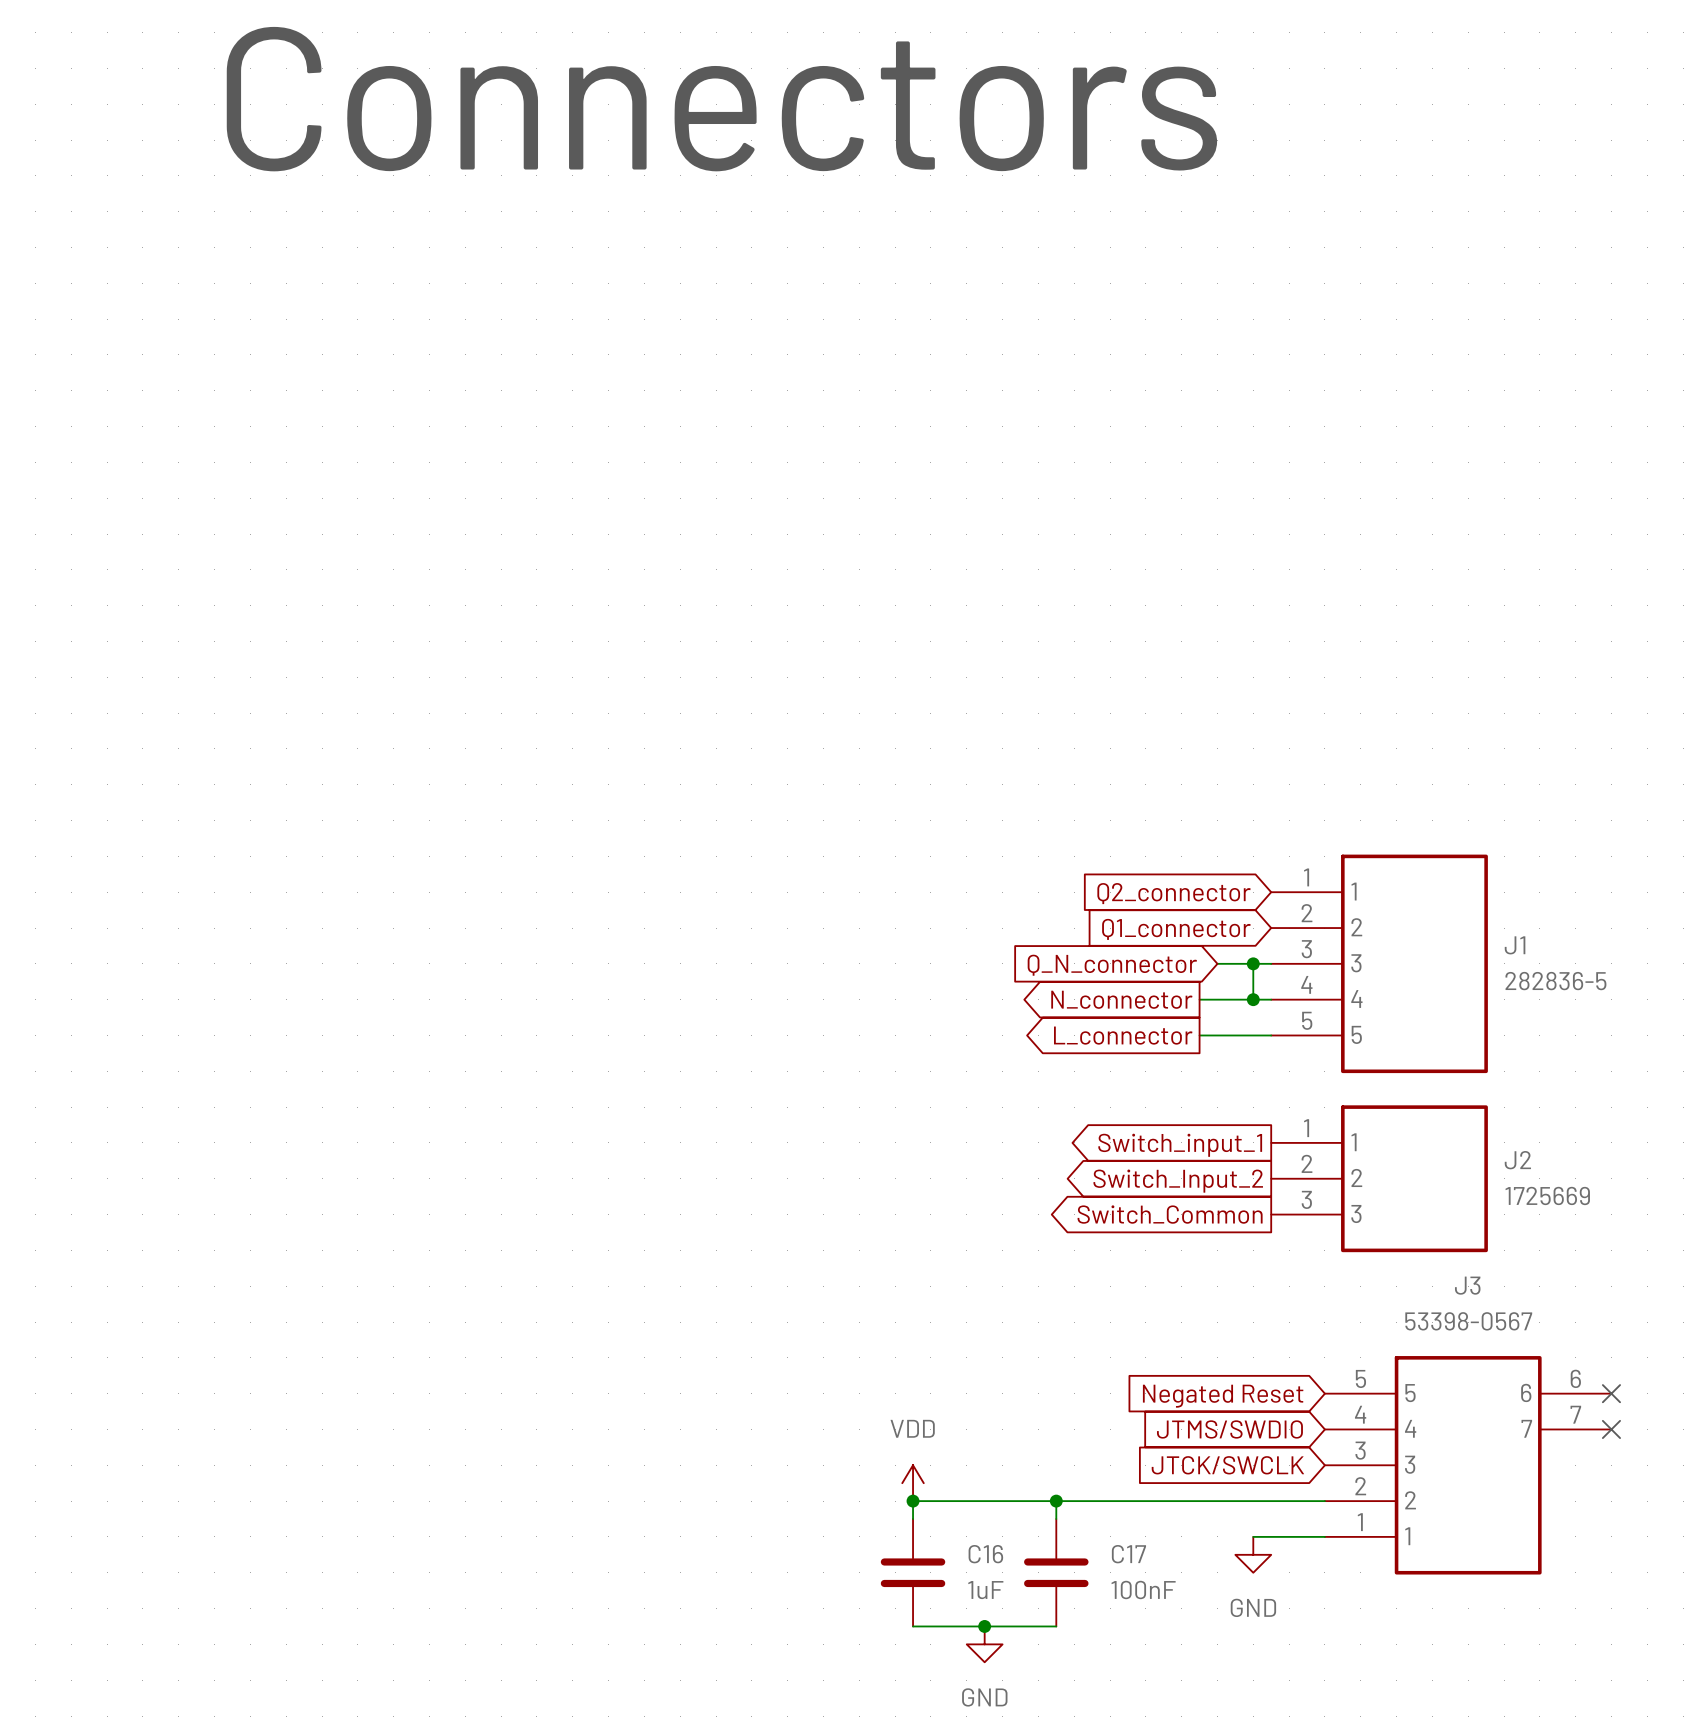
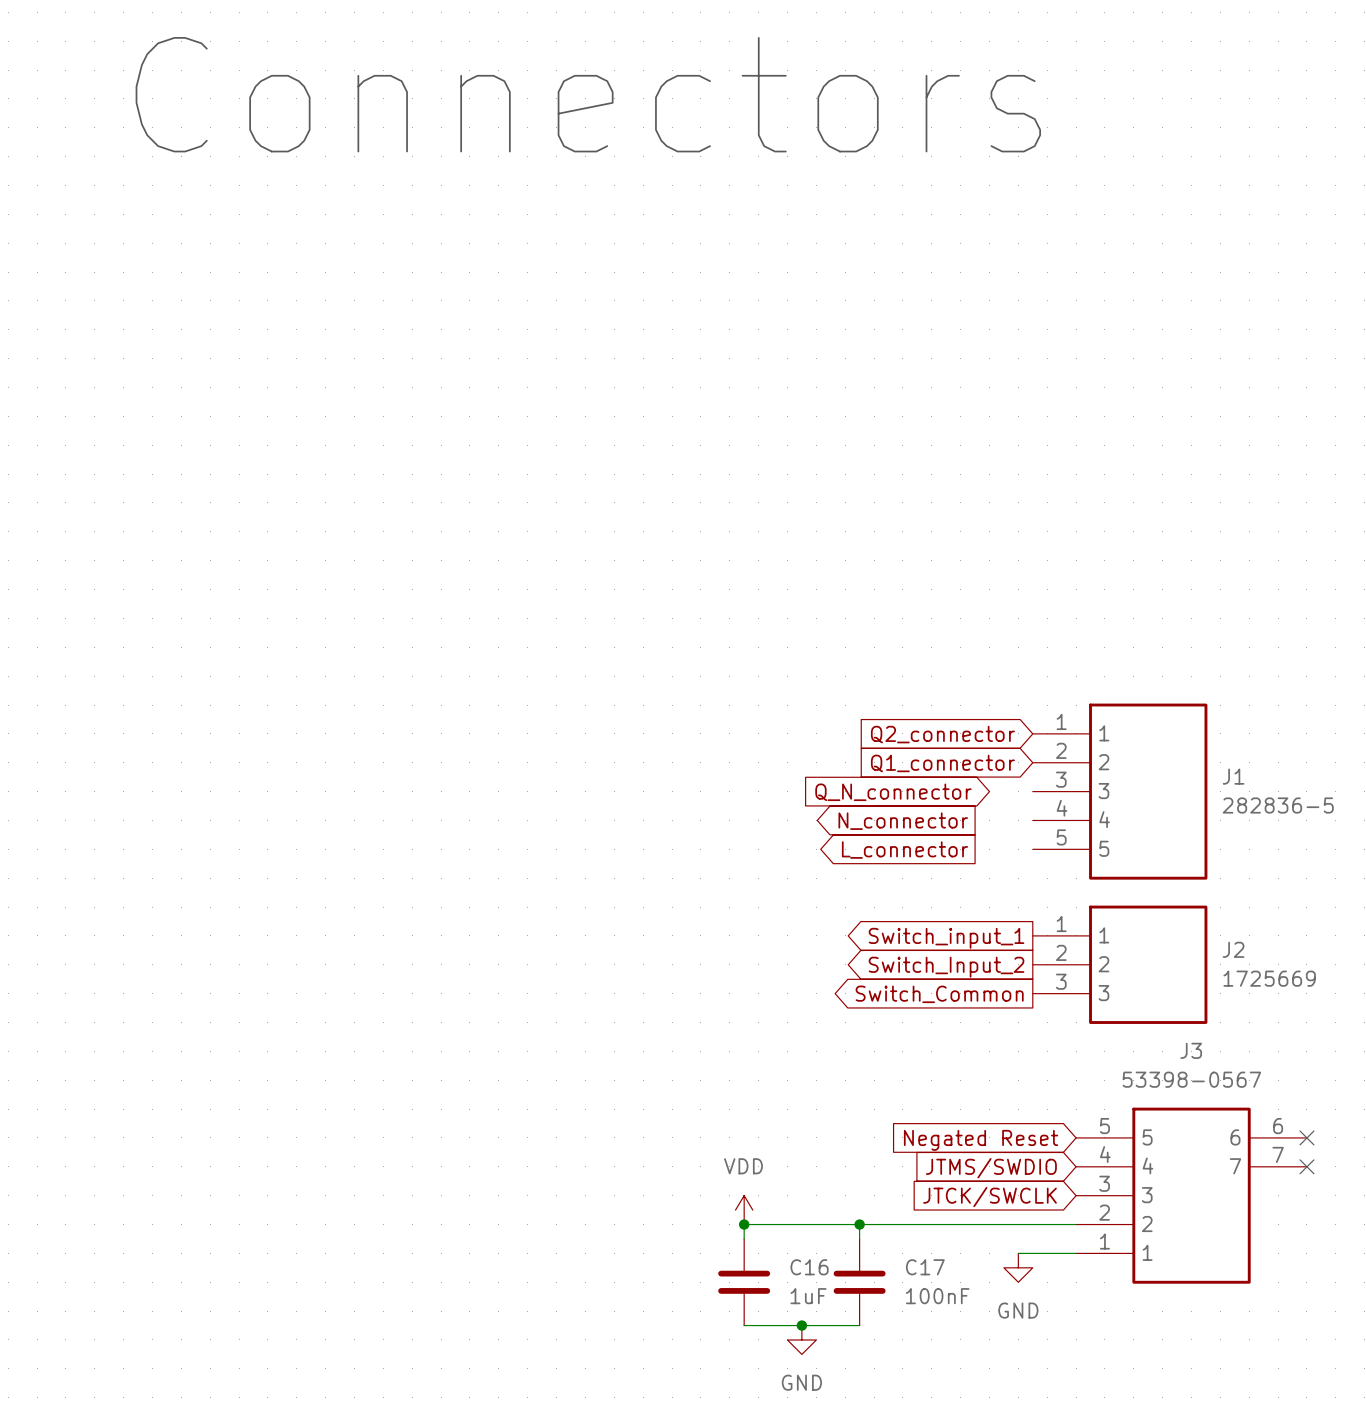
wire: (1217, 963) (1271, 963) -> none
wire: (1253, 963) (1253, 999) -> none
junction: (1253, 963) -> none
wire: (1199, 999) (1271, 999) -> none
junction: (1253, 999) -> none
wire: (1199, 1035) (1271, 1035) -> none

